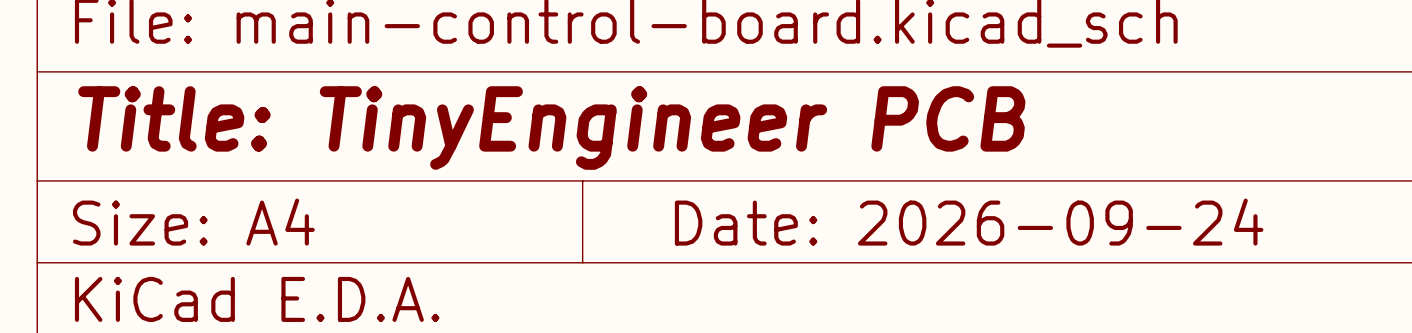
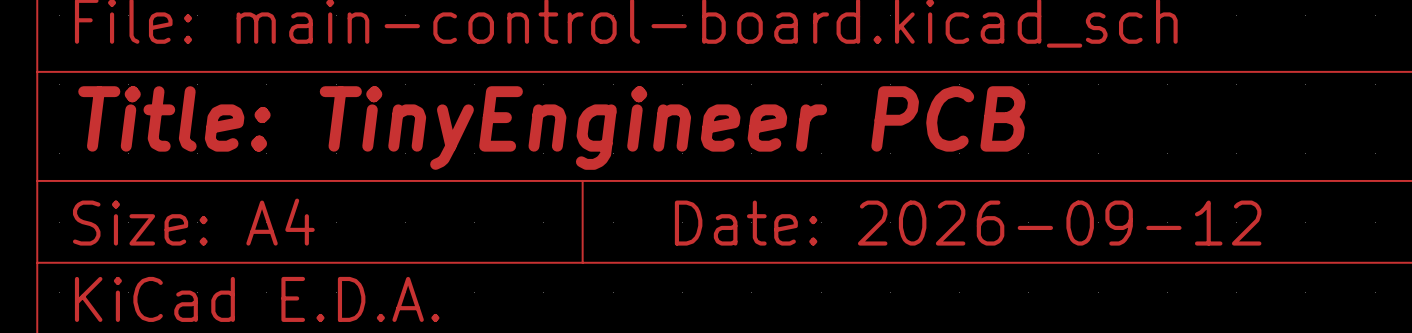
title block: Date: 2026-09-24 (969, 222) -> Date: 2026-09-12 (968, 223)

